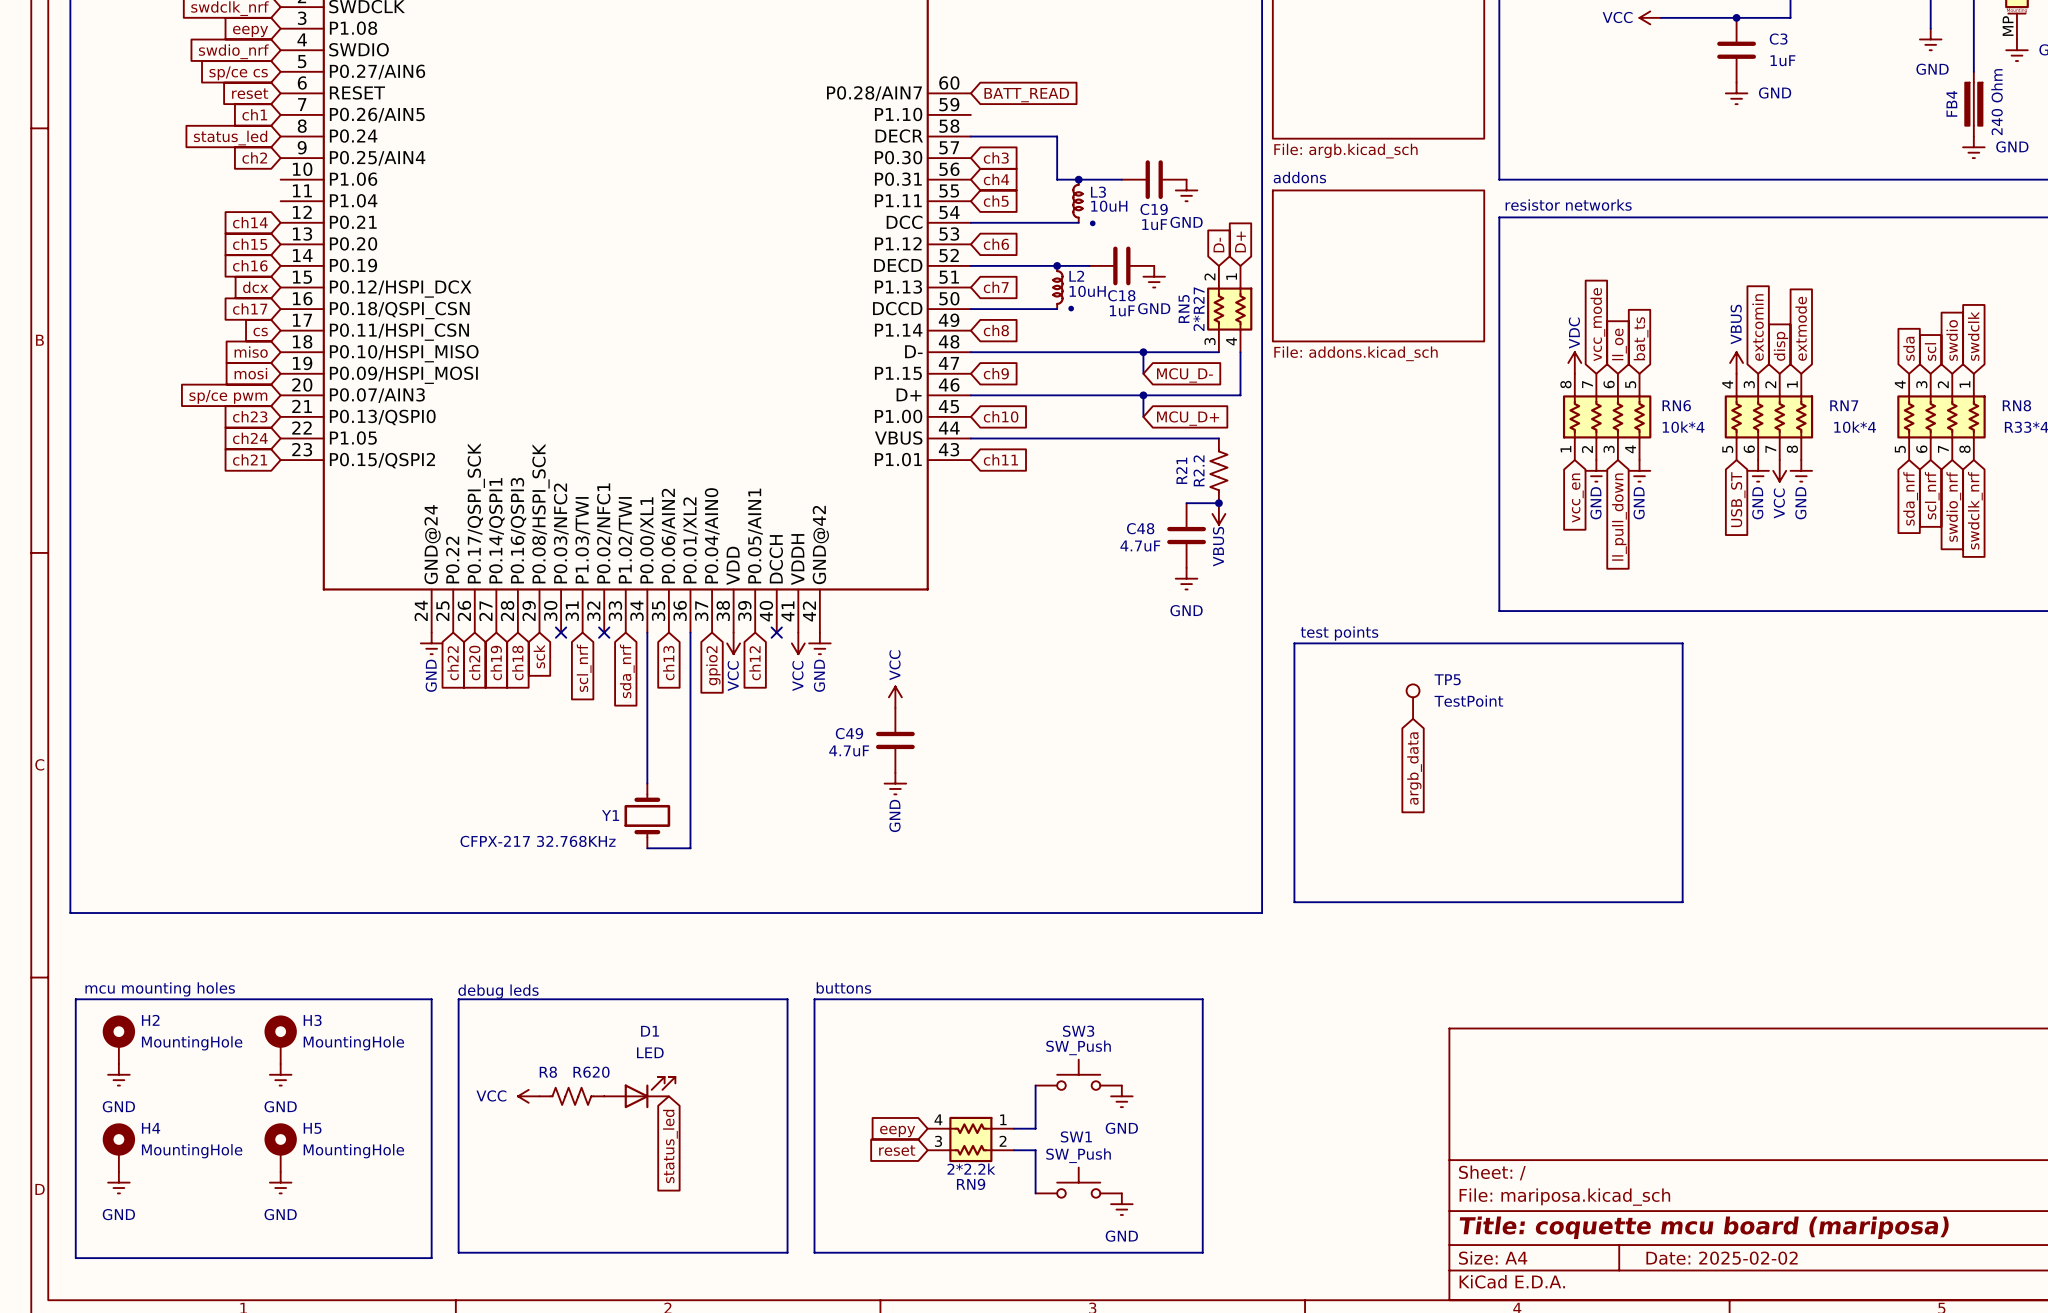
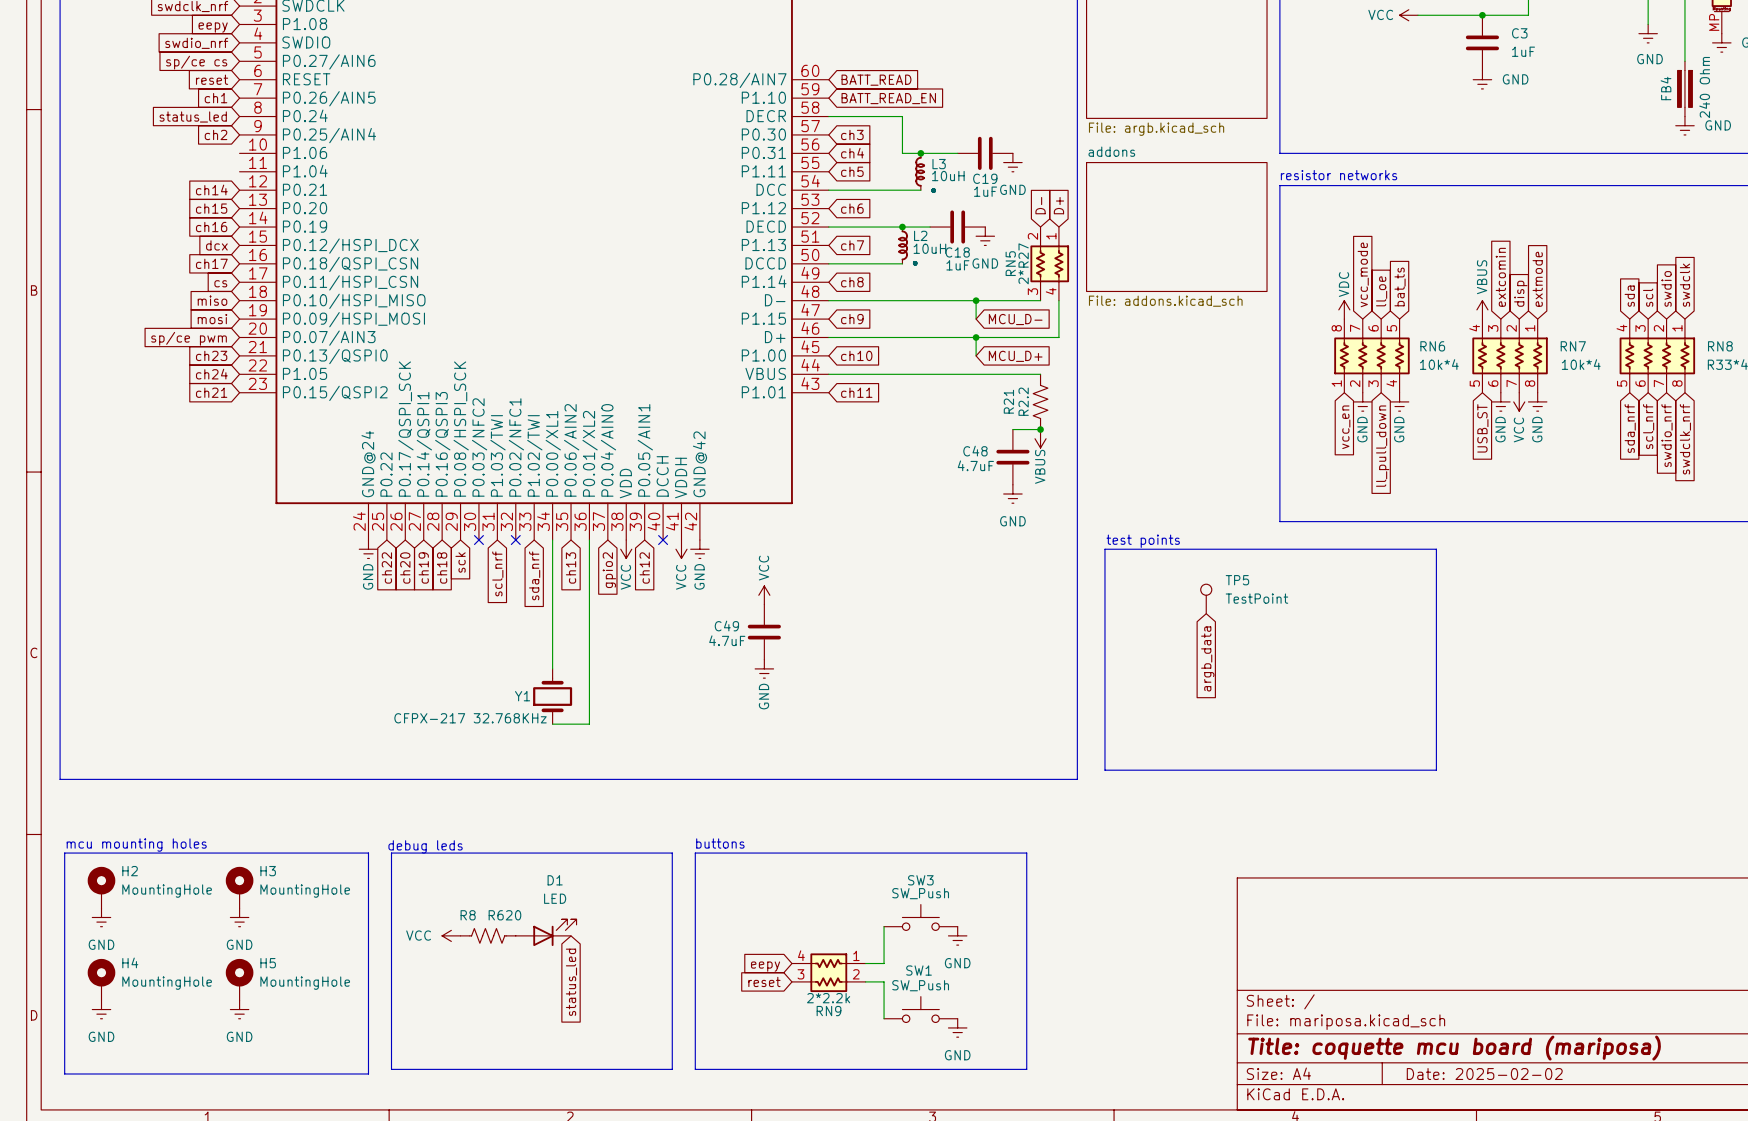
global label: none -> BATT_READ_EN (888, 98)

